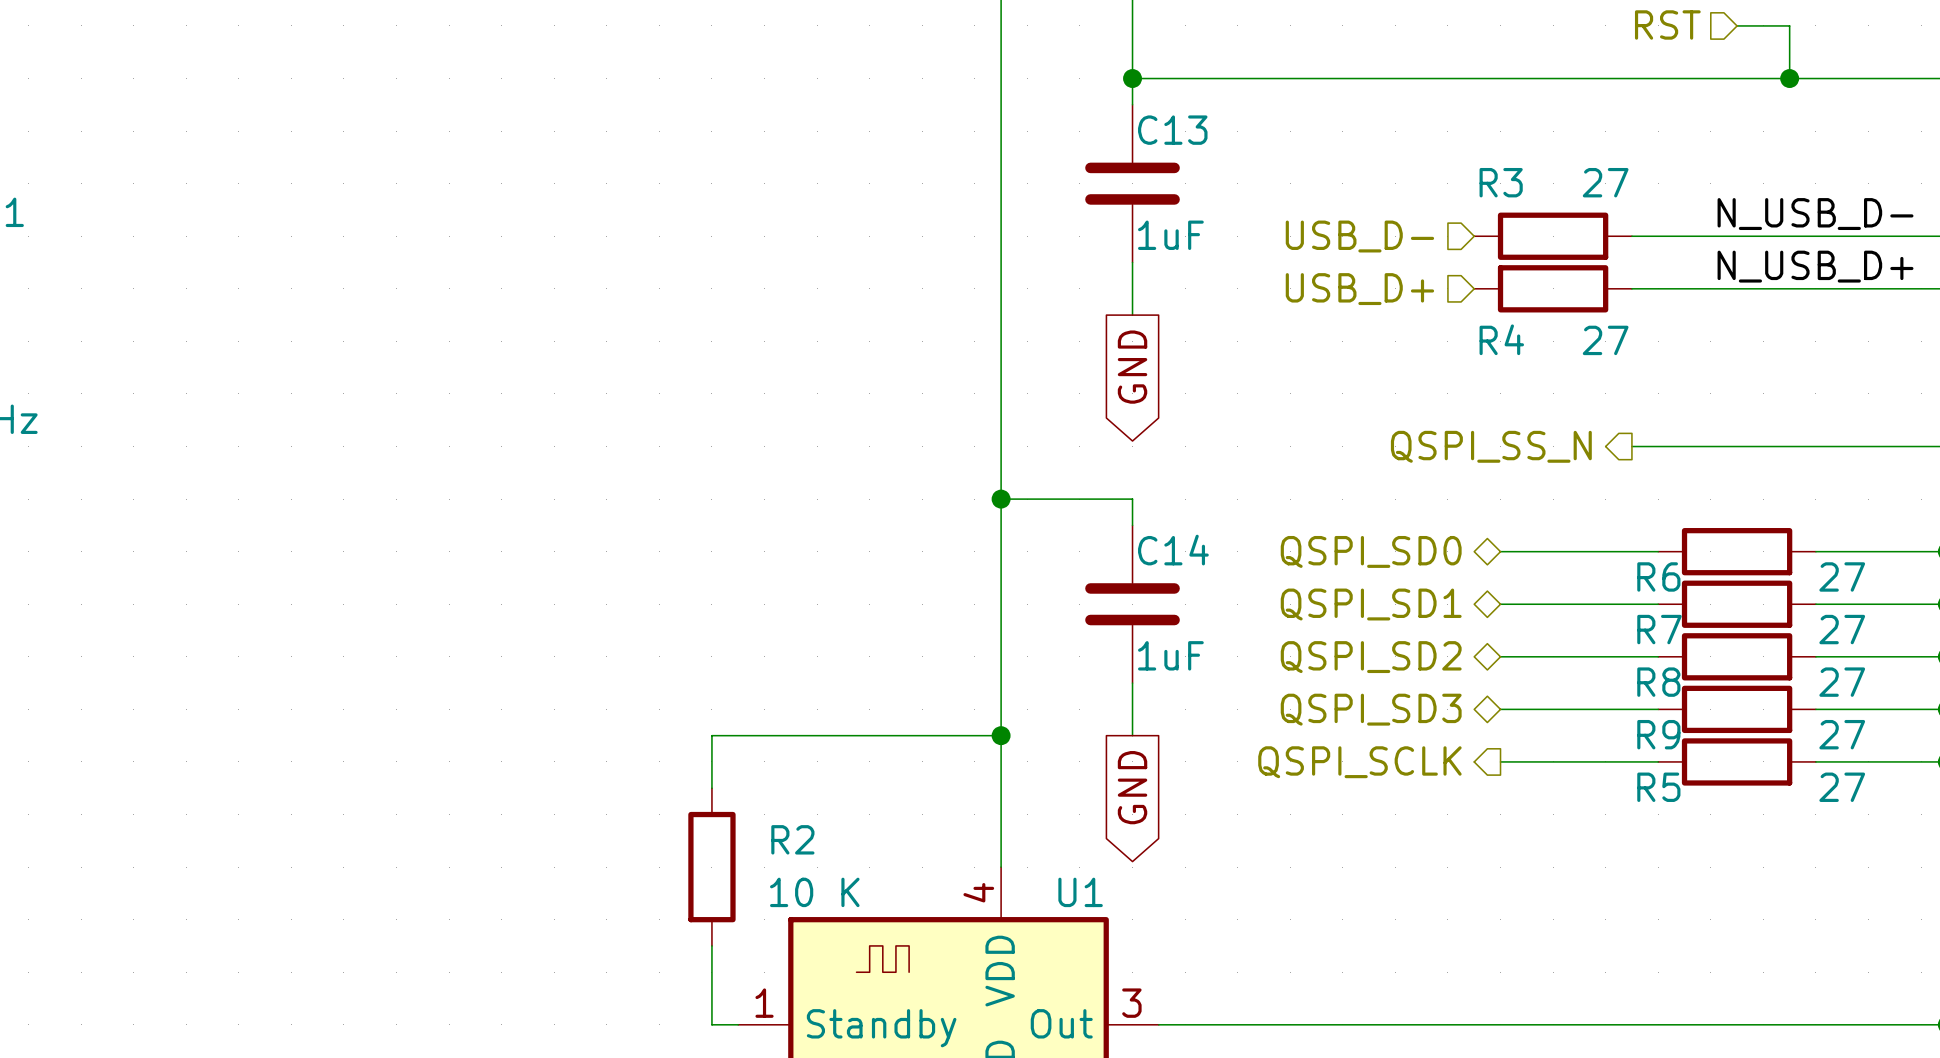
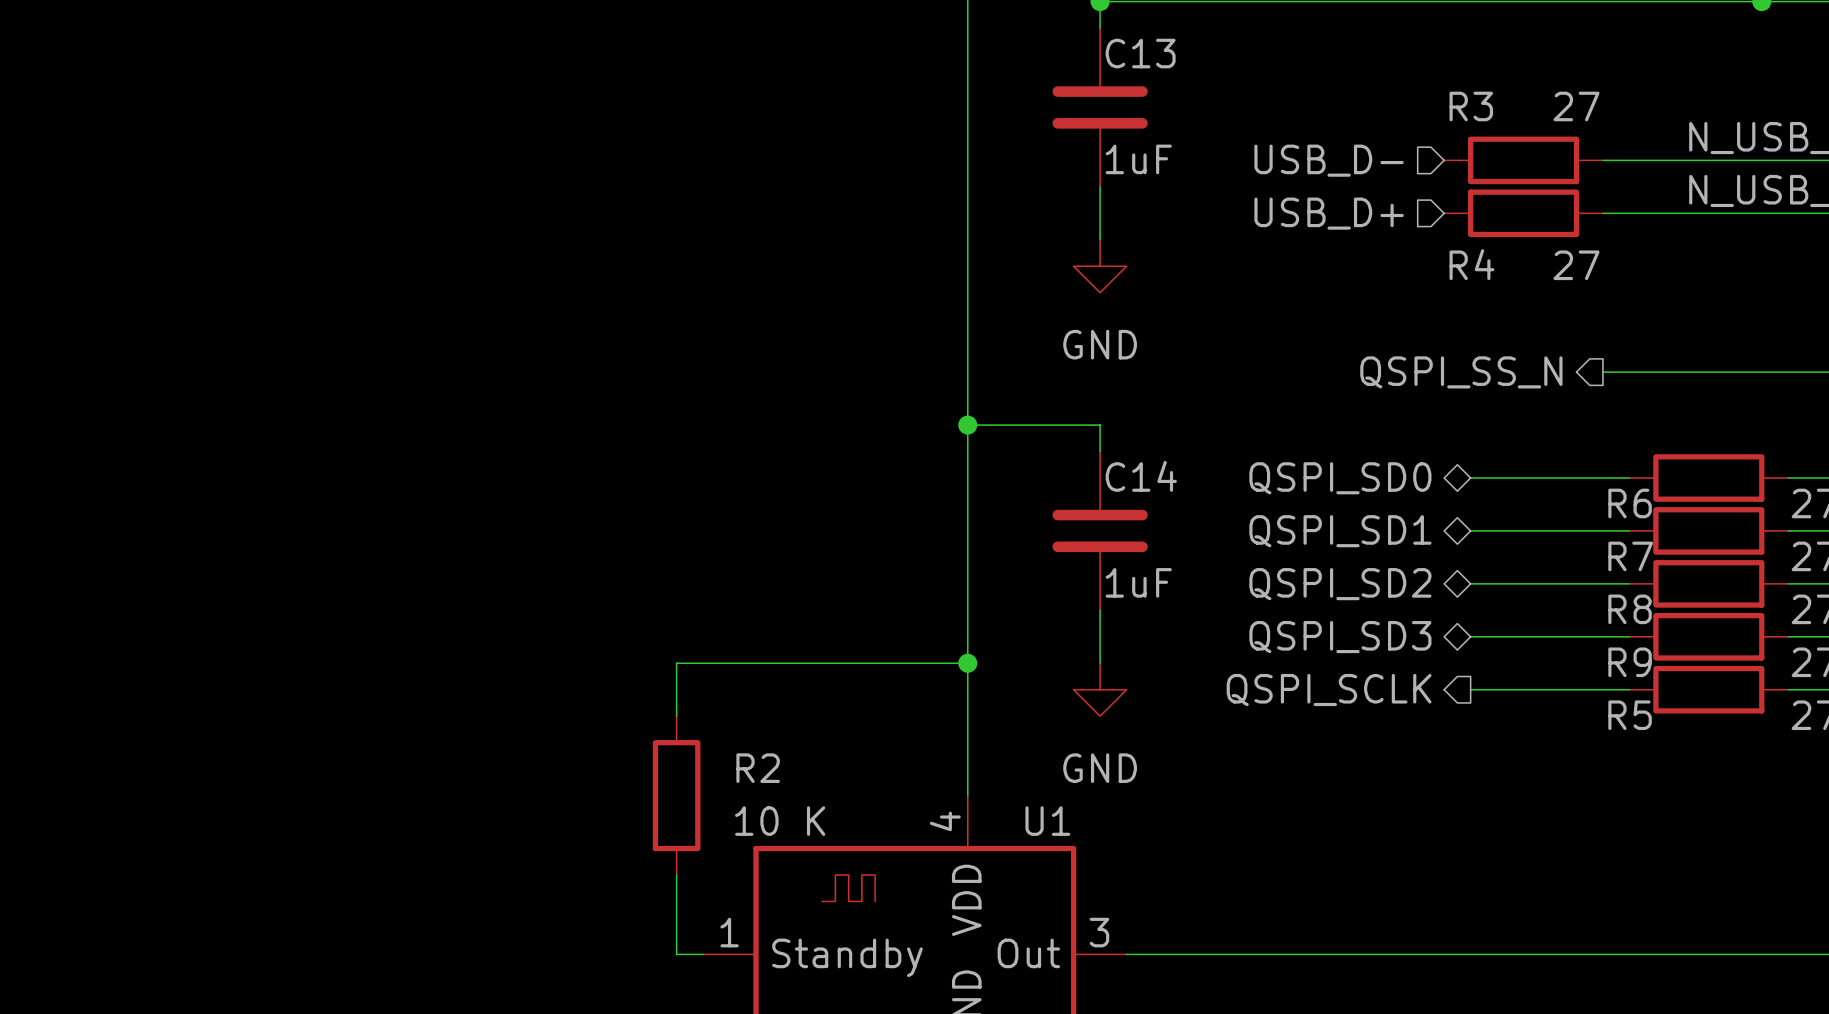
power symbol: none -> GND (1100, 266)
global label: GND (1132, 367) -> none
power symbol: none -> GND (1100, 689)
global label: GND (1132, 787) -> none

